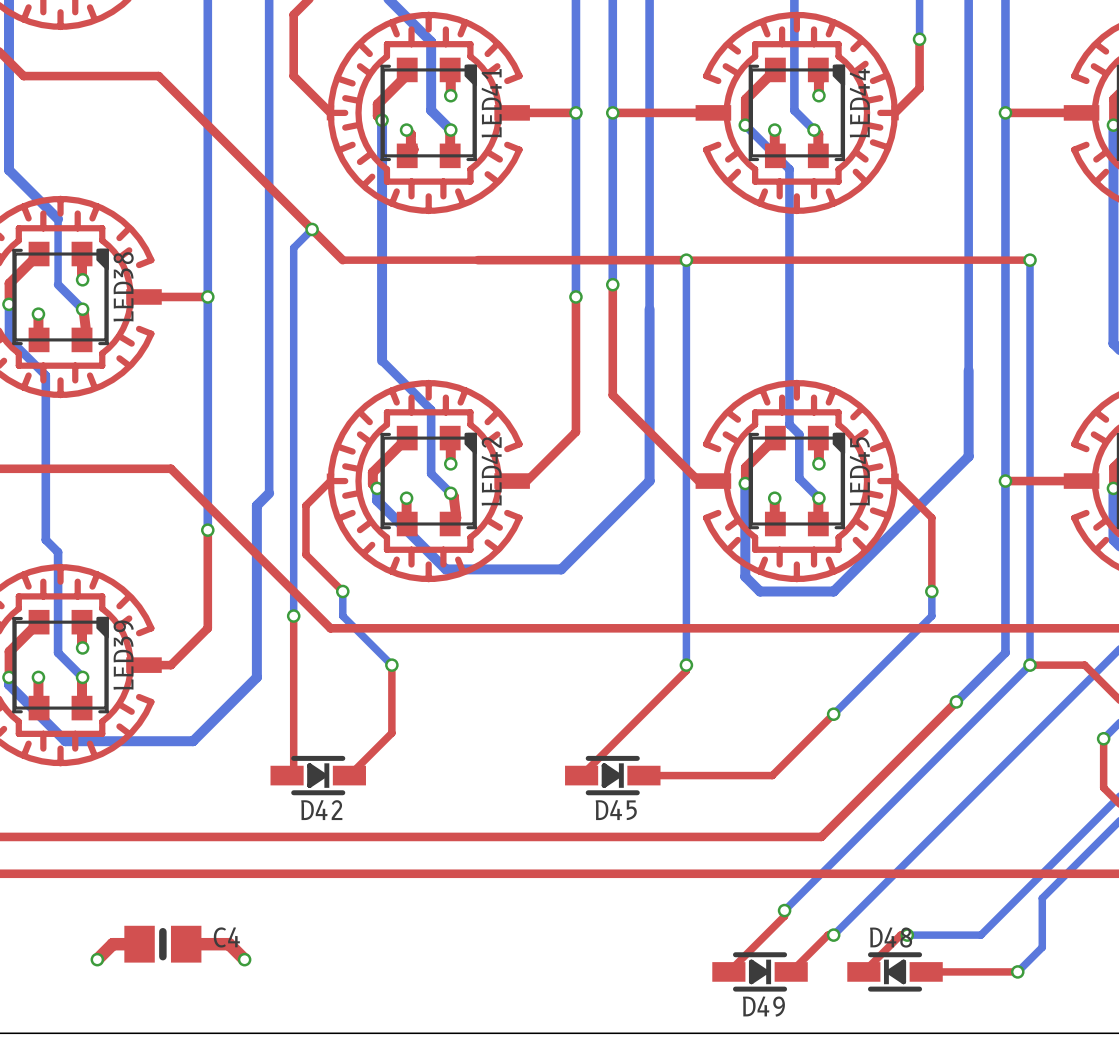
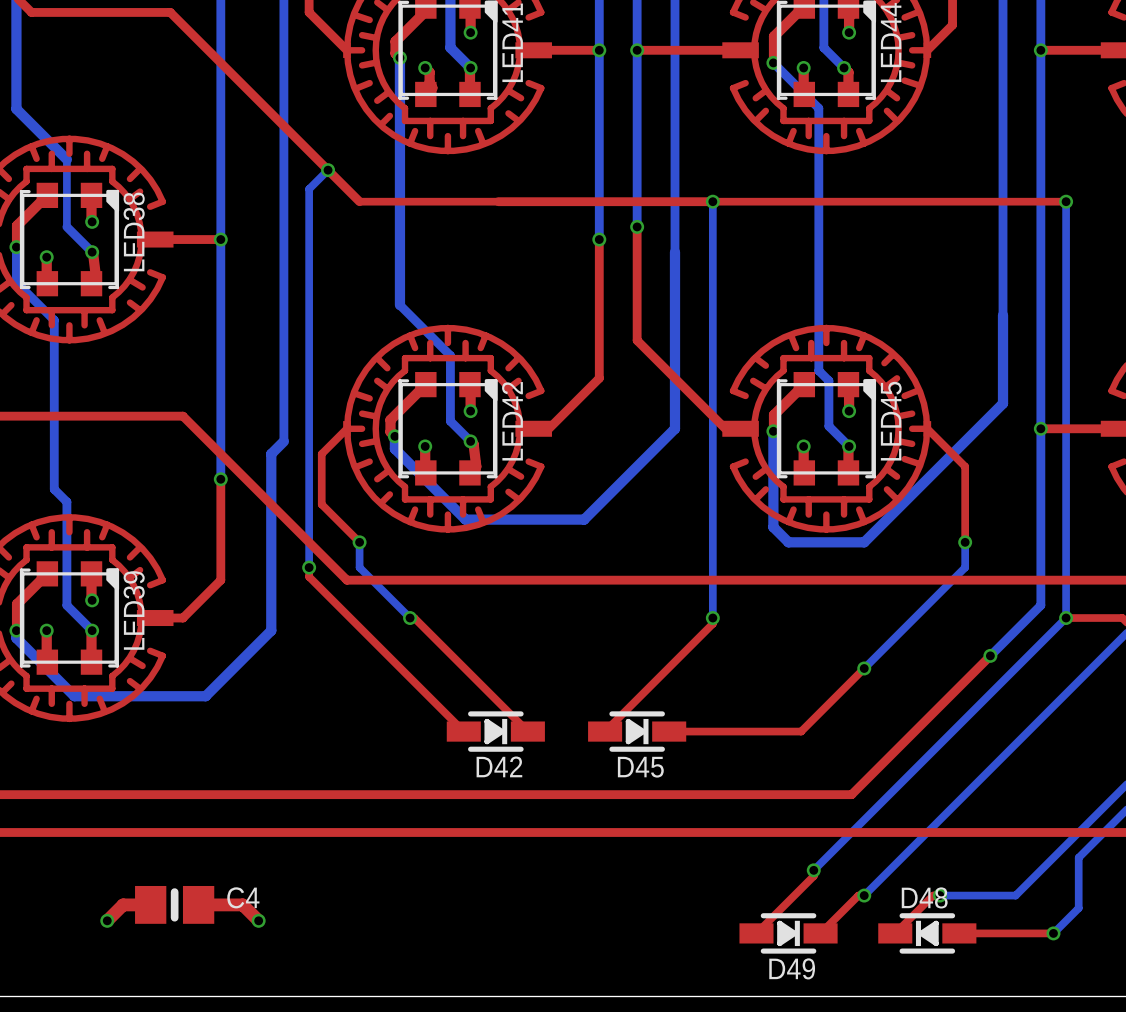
top track: (293, 625) (293, 768) (287, 775) -> (309, 576) (463, 731)
top track: (391, 665) (391, 733) (349, 775) -> (410, 618) (414, 618) (527, 731)
D42 position: (318, 775) -> (495, 731)

